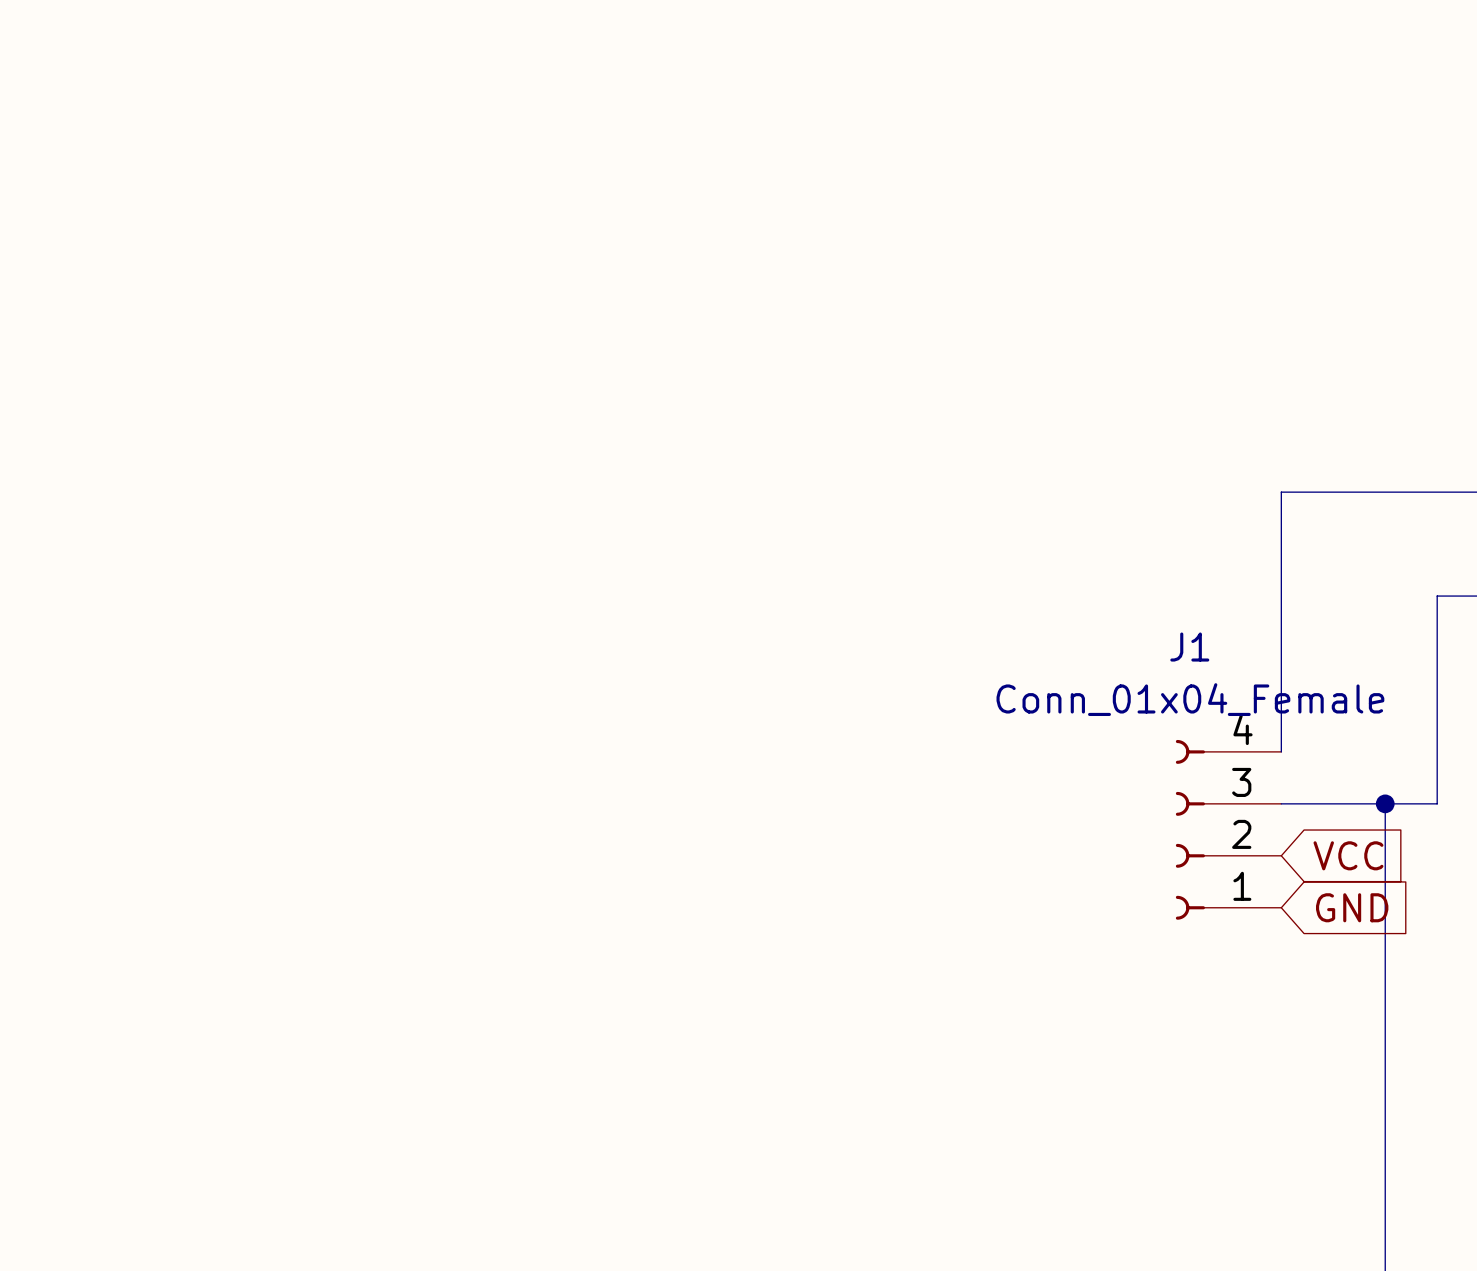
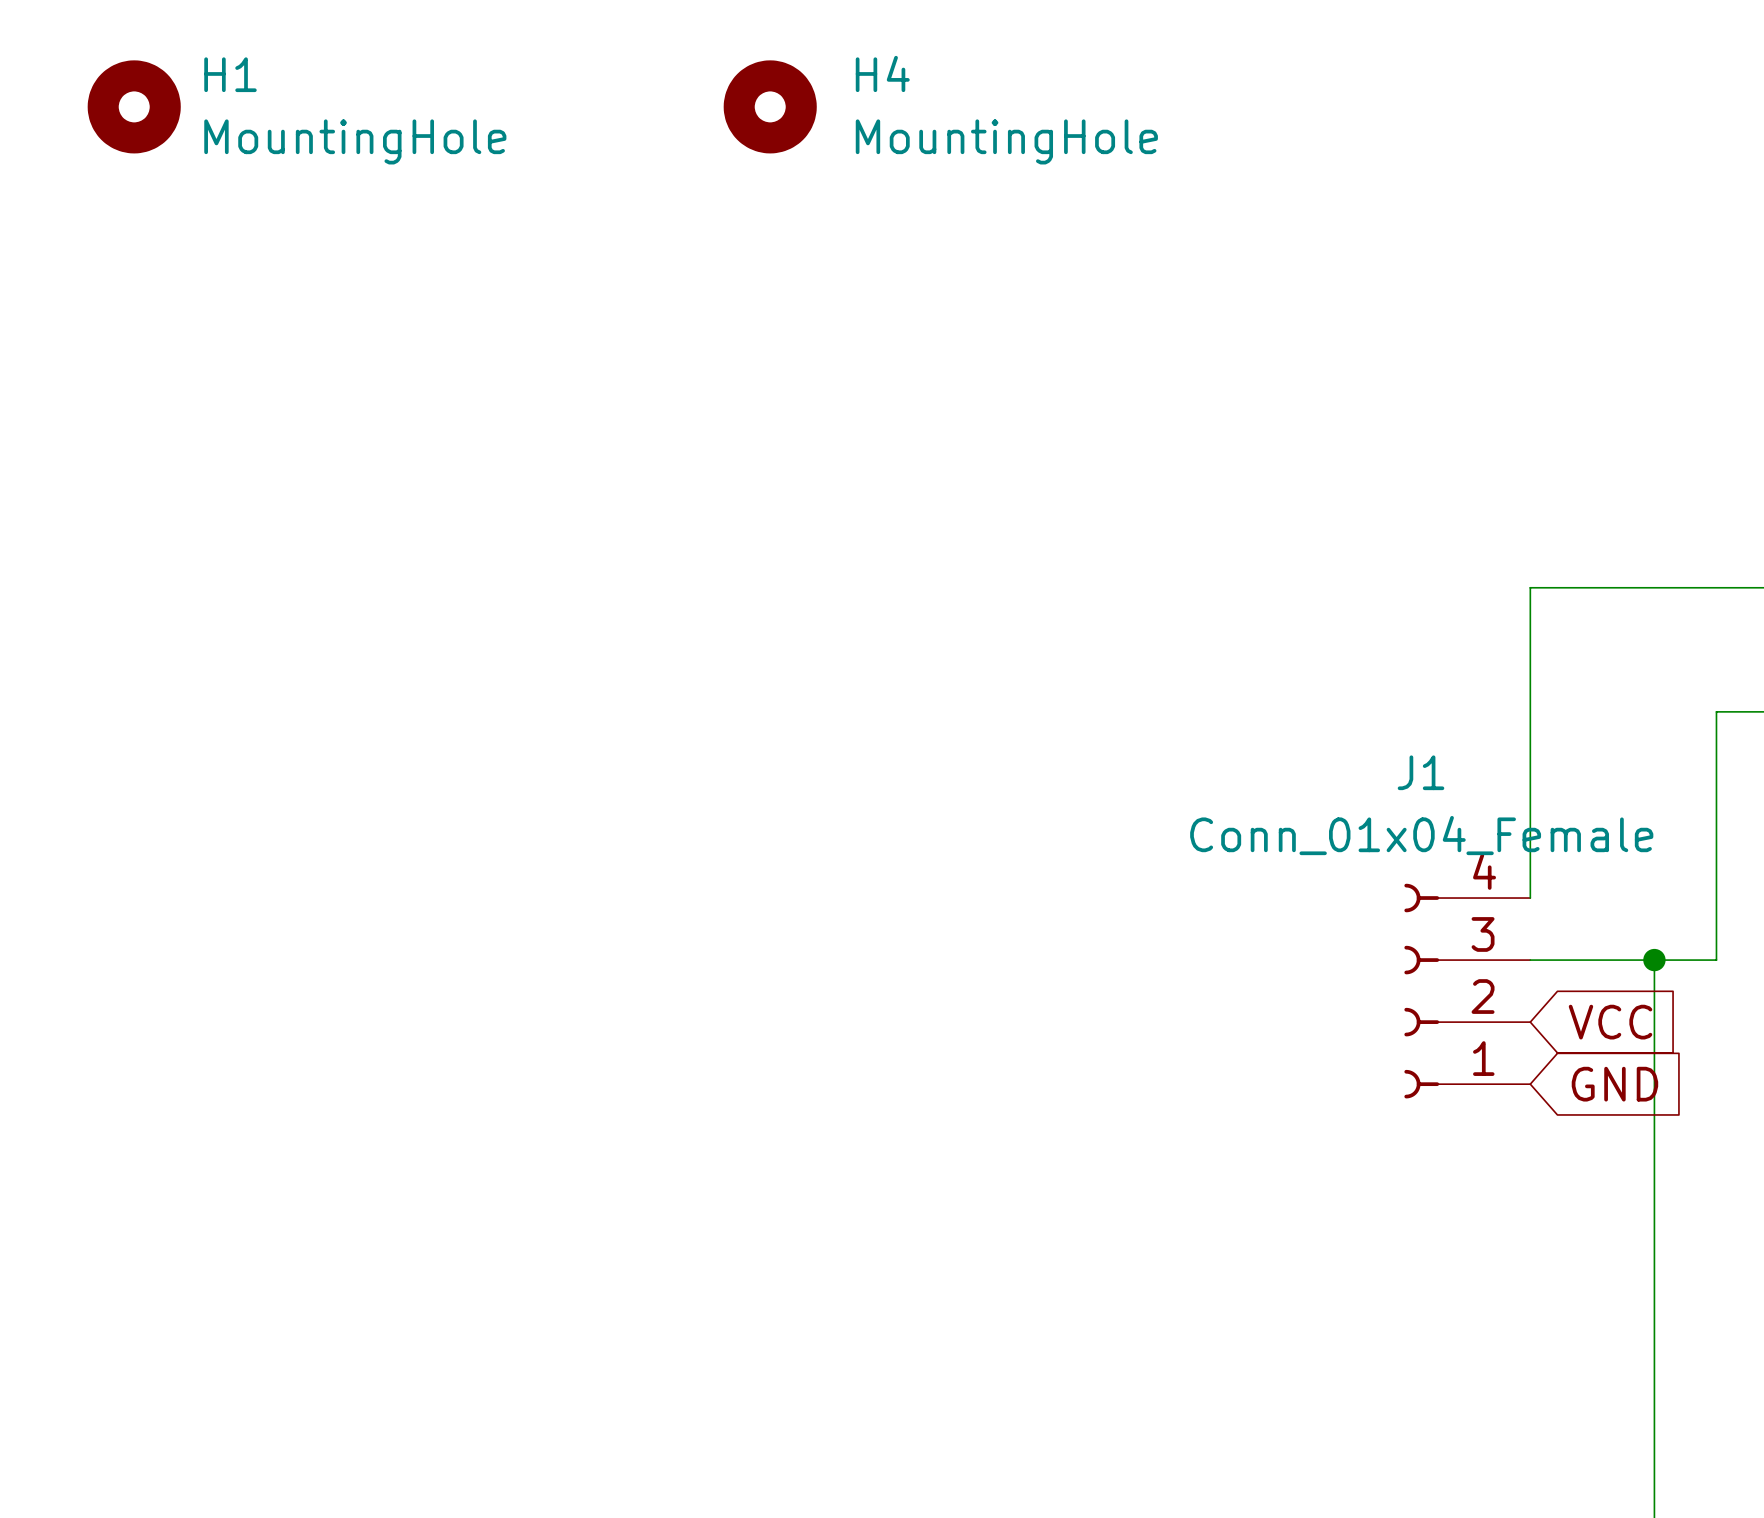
H1: none -> MountingHole (134, 106)
H4: none -> MountingHole (770, 106)

